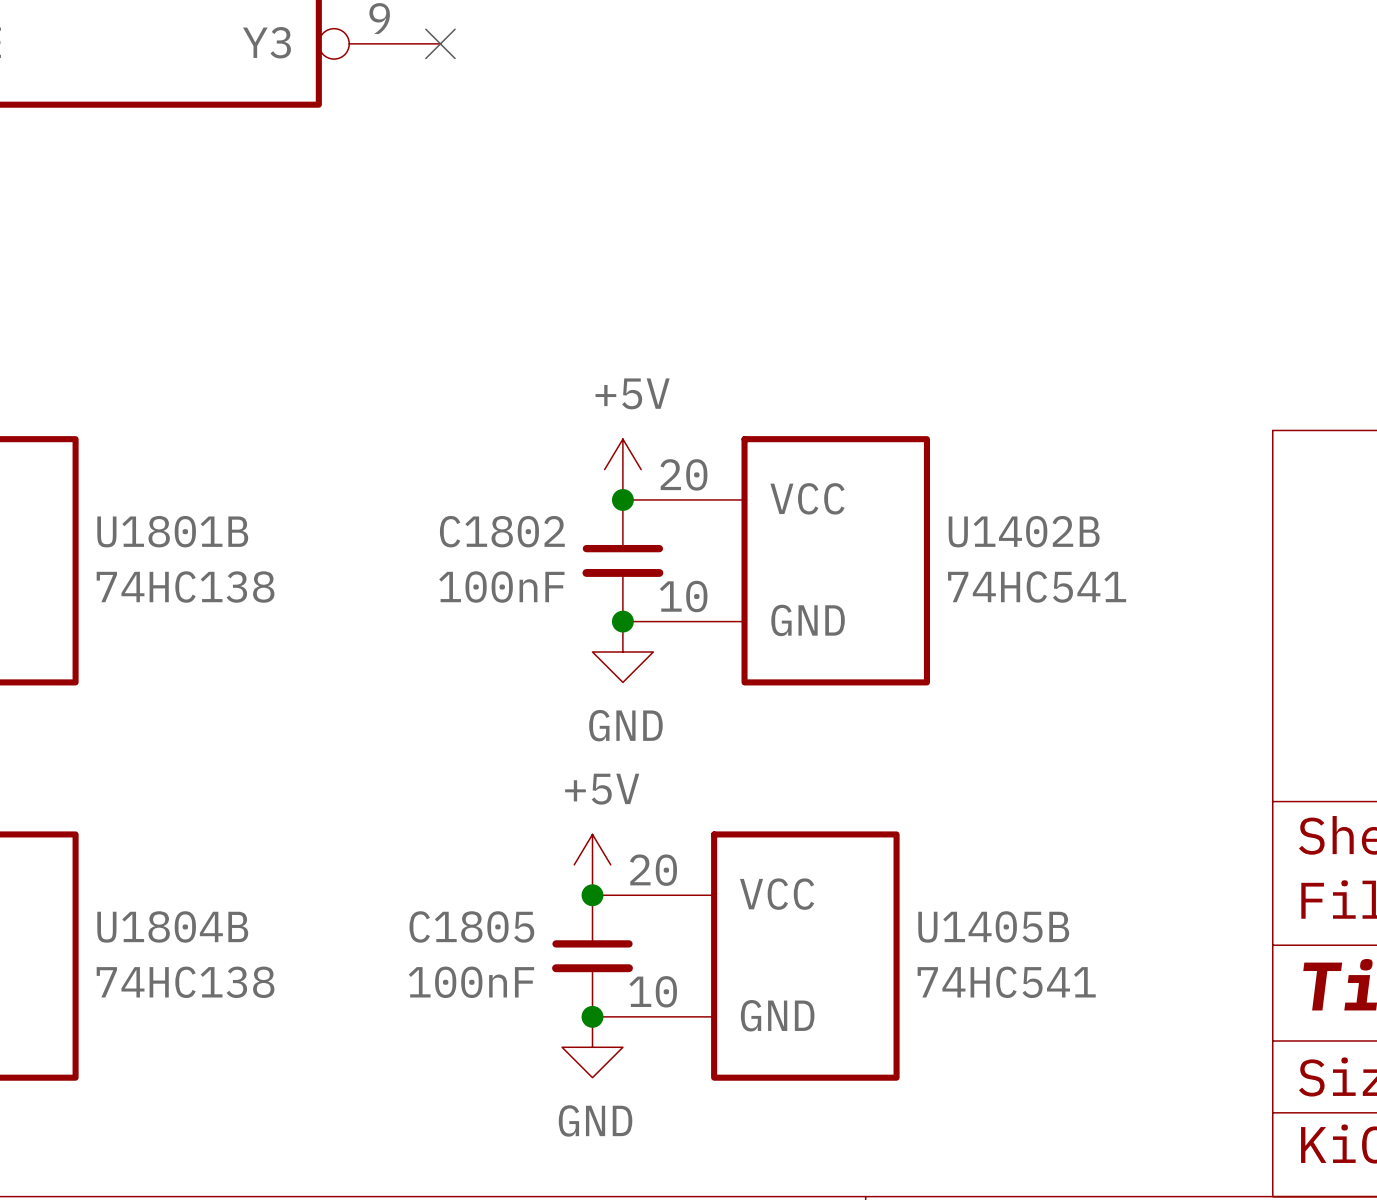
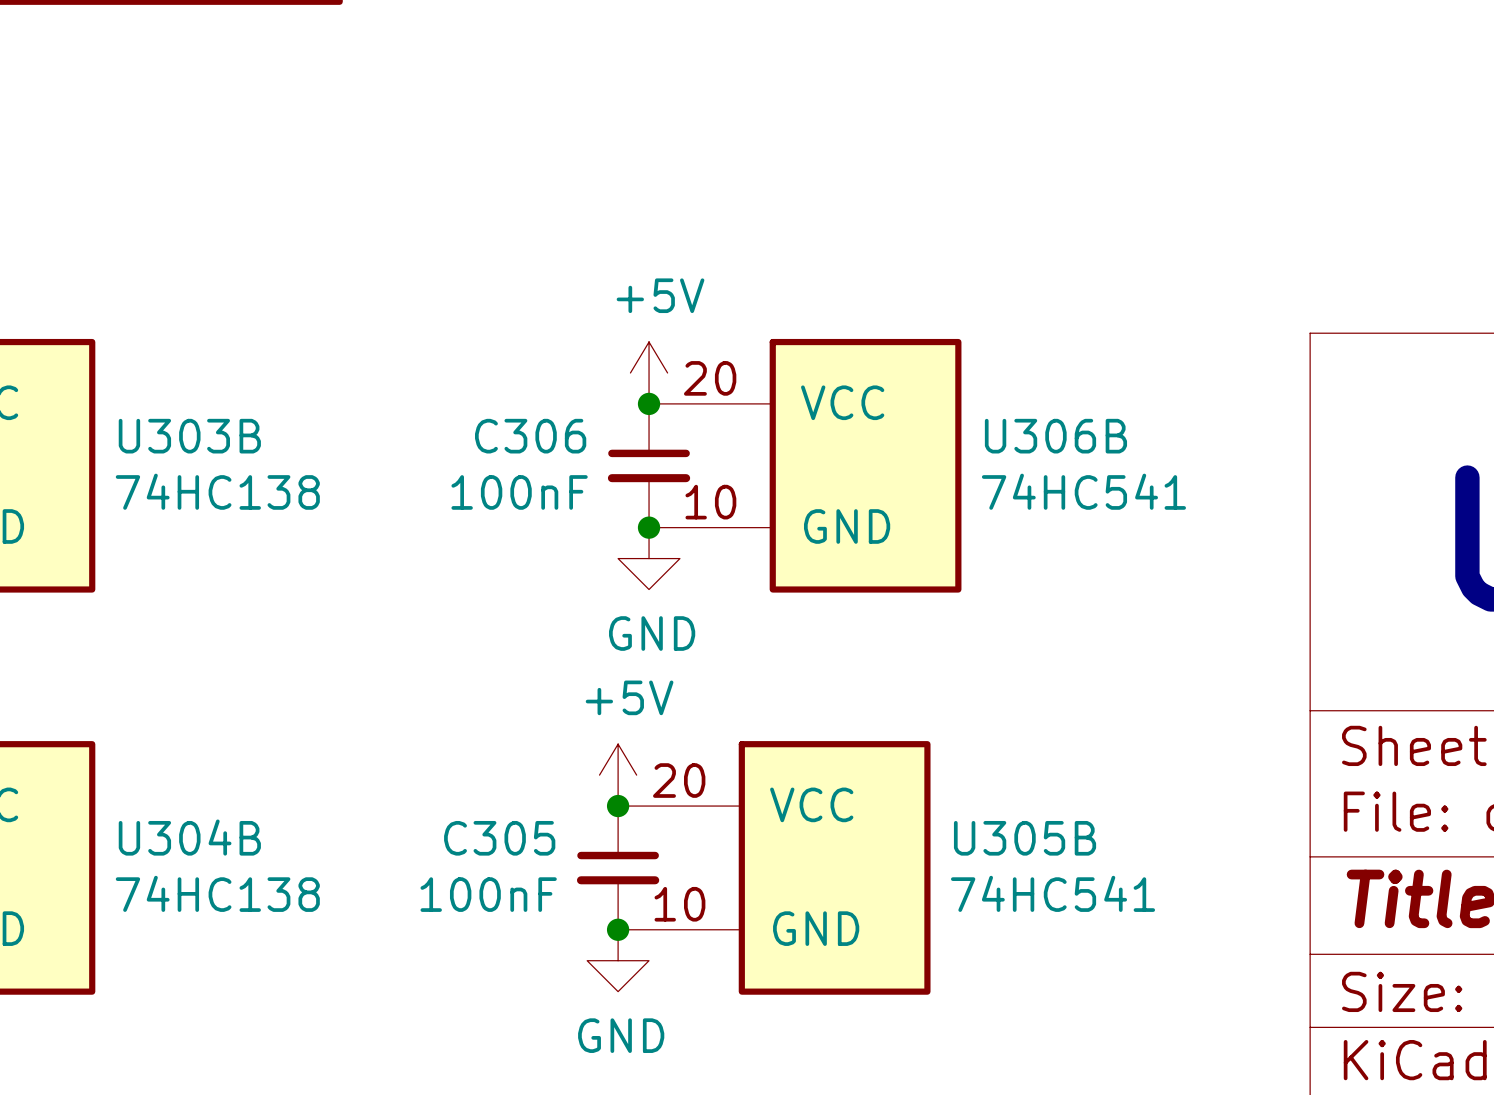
U1801B name: U1801B (172, 531) -> U303B (189, 436)
C1802 name: C1802 (502, 531) -> C306 (530, 436)
U1402B name: U1402B (1024, 531) -> U306B (1055, 436)
U1804B name: U1804B (172, 926) -> U304B (189, 837)
C1805 name: C1805 (471, 926) -> C305 (499, 838)
U1405B name: U1405B (993, 926) -> U305B (1025, 838)

